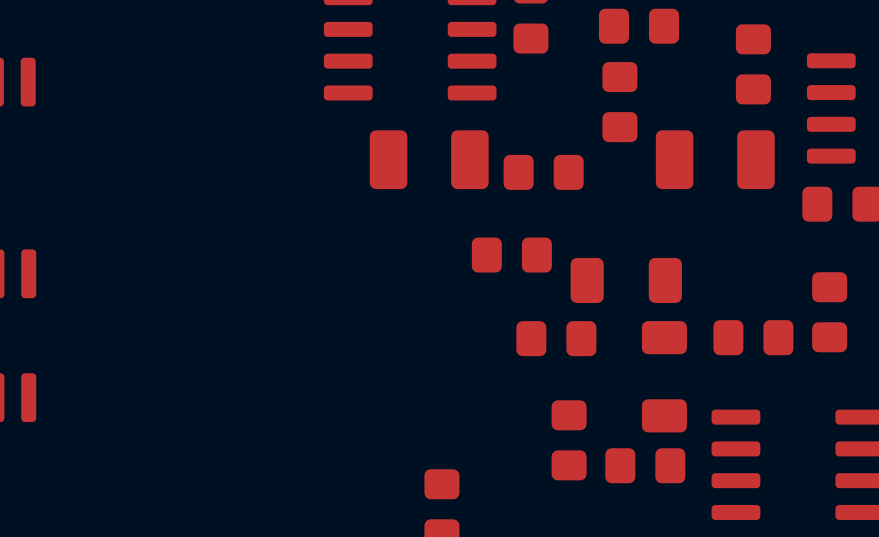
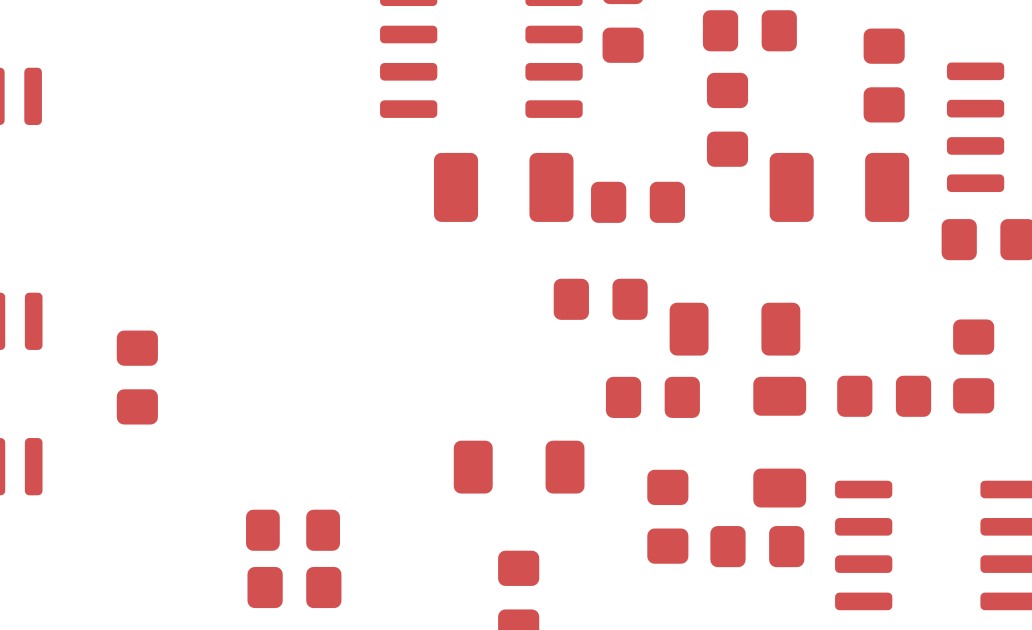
part: none -> (137, 377)
part: none -> (519, 467)
part: none -> (293, 530)
part: none -> (294, 587)

